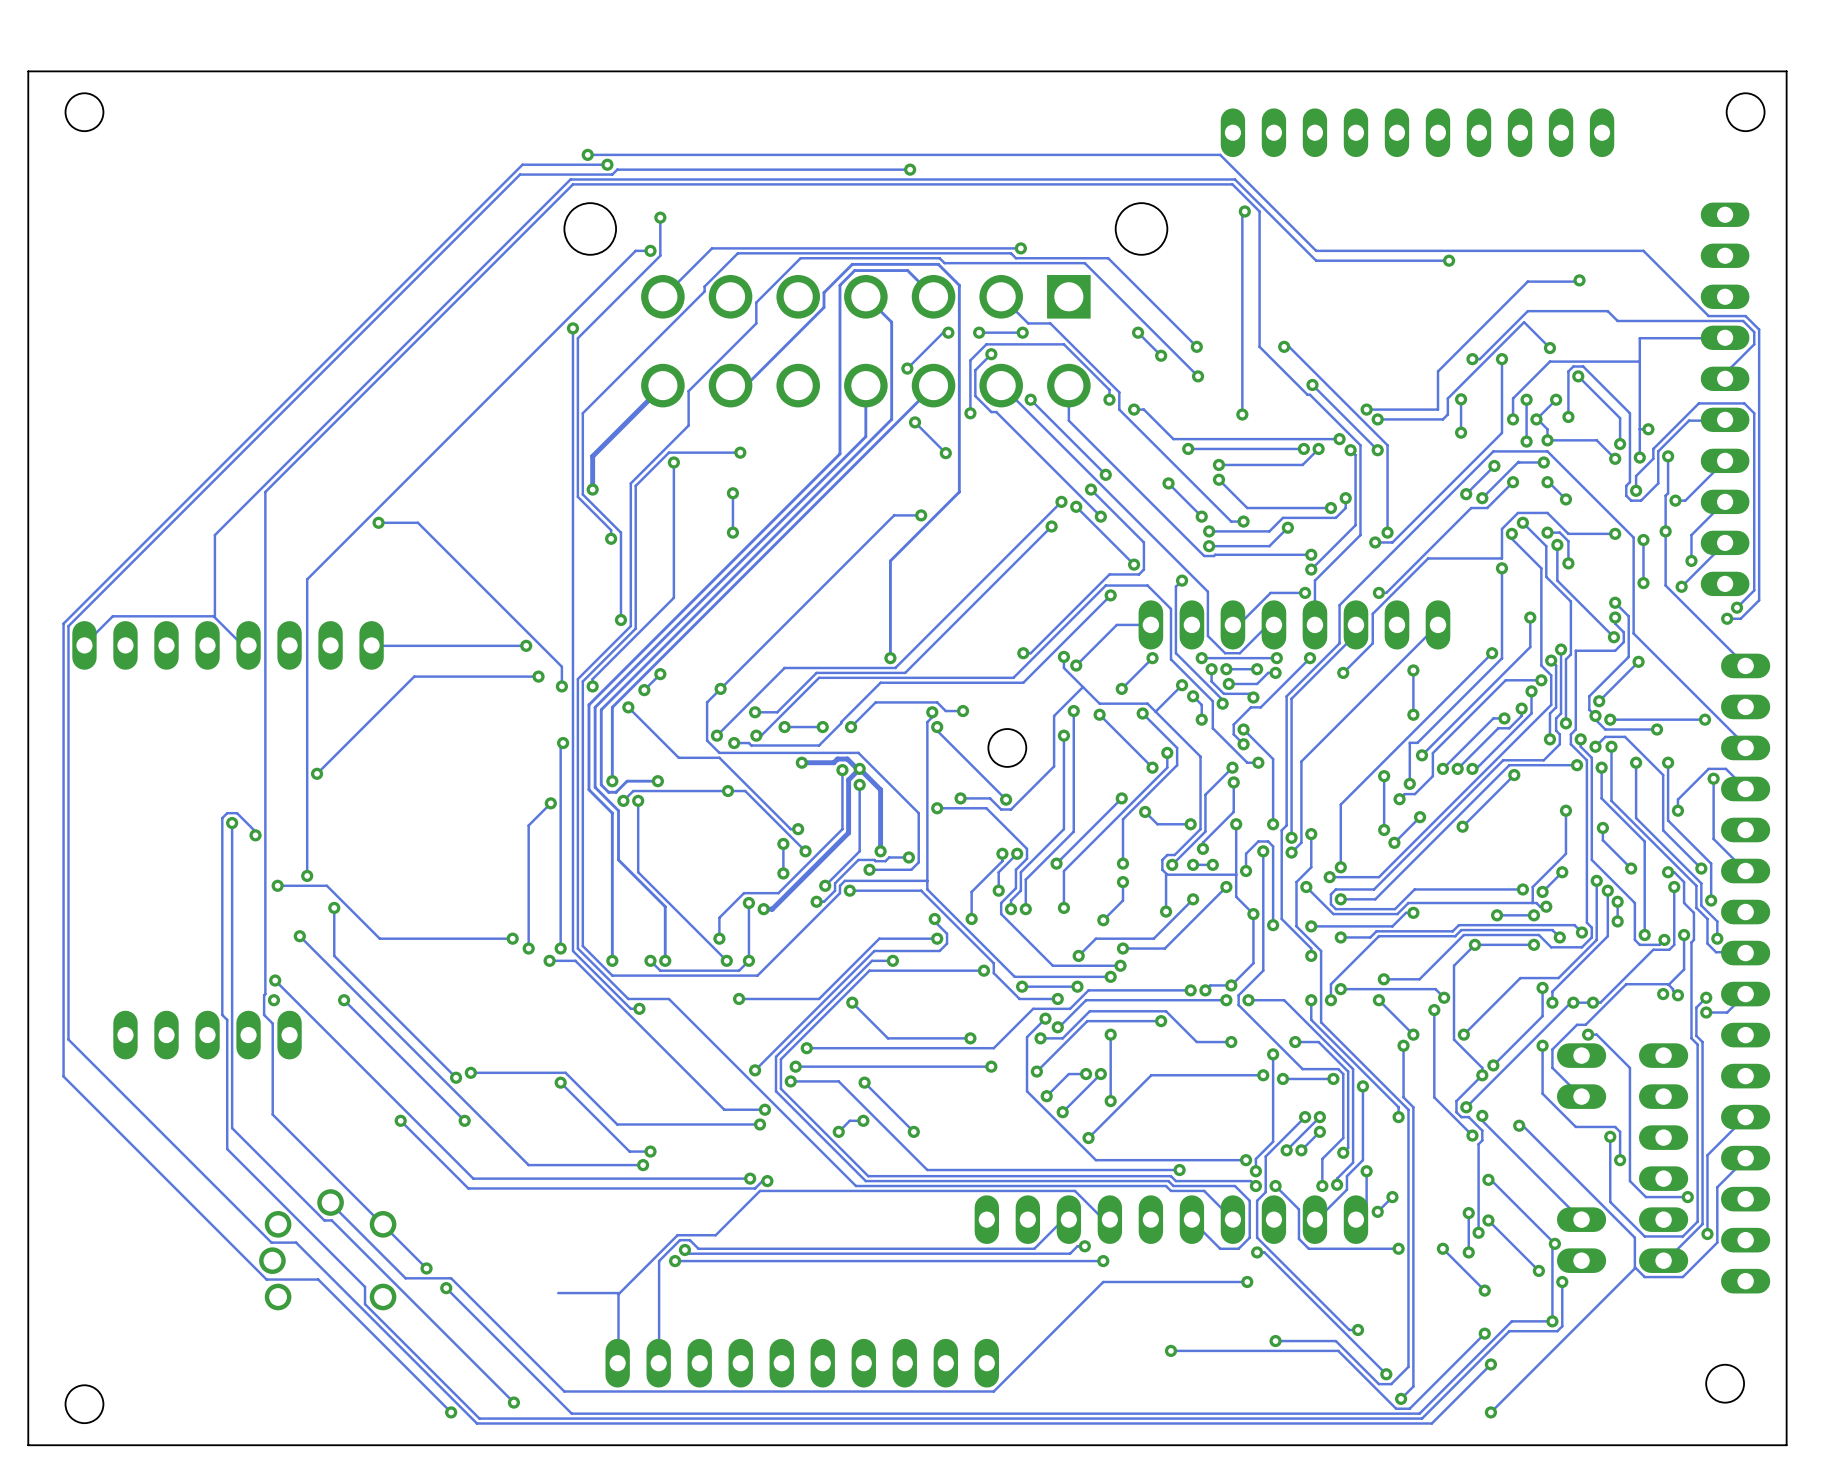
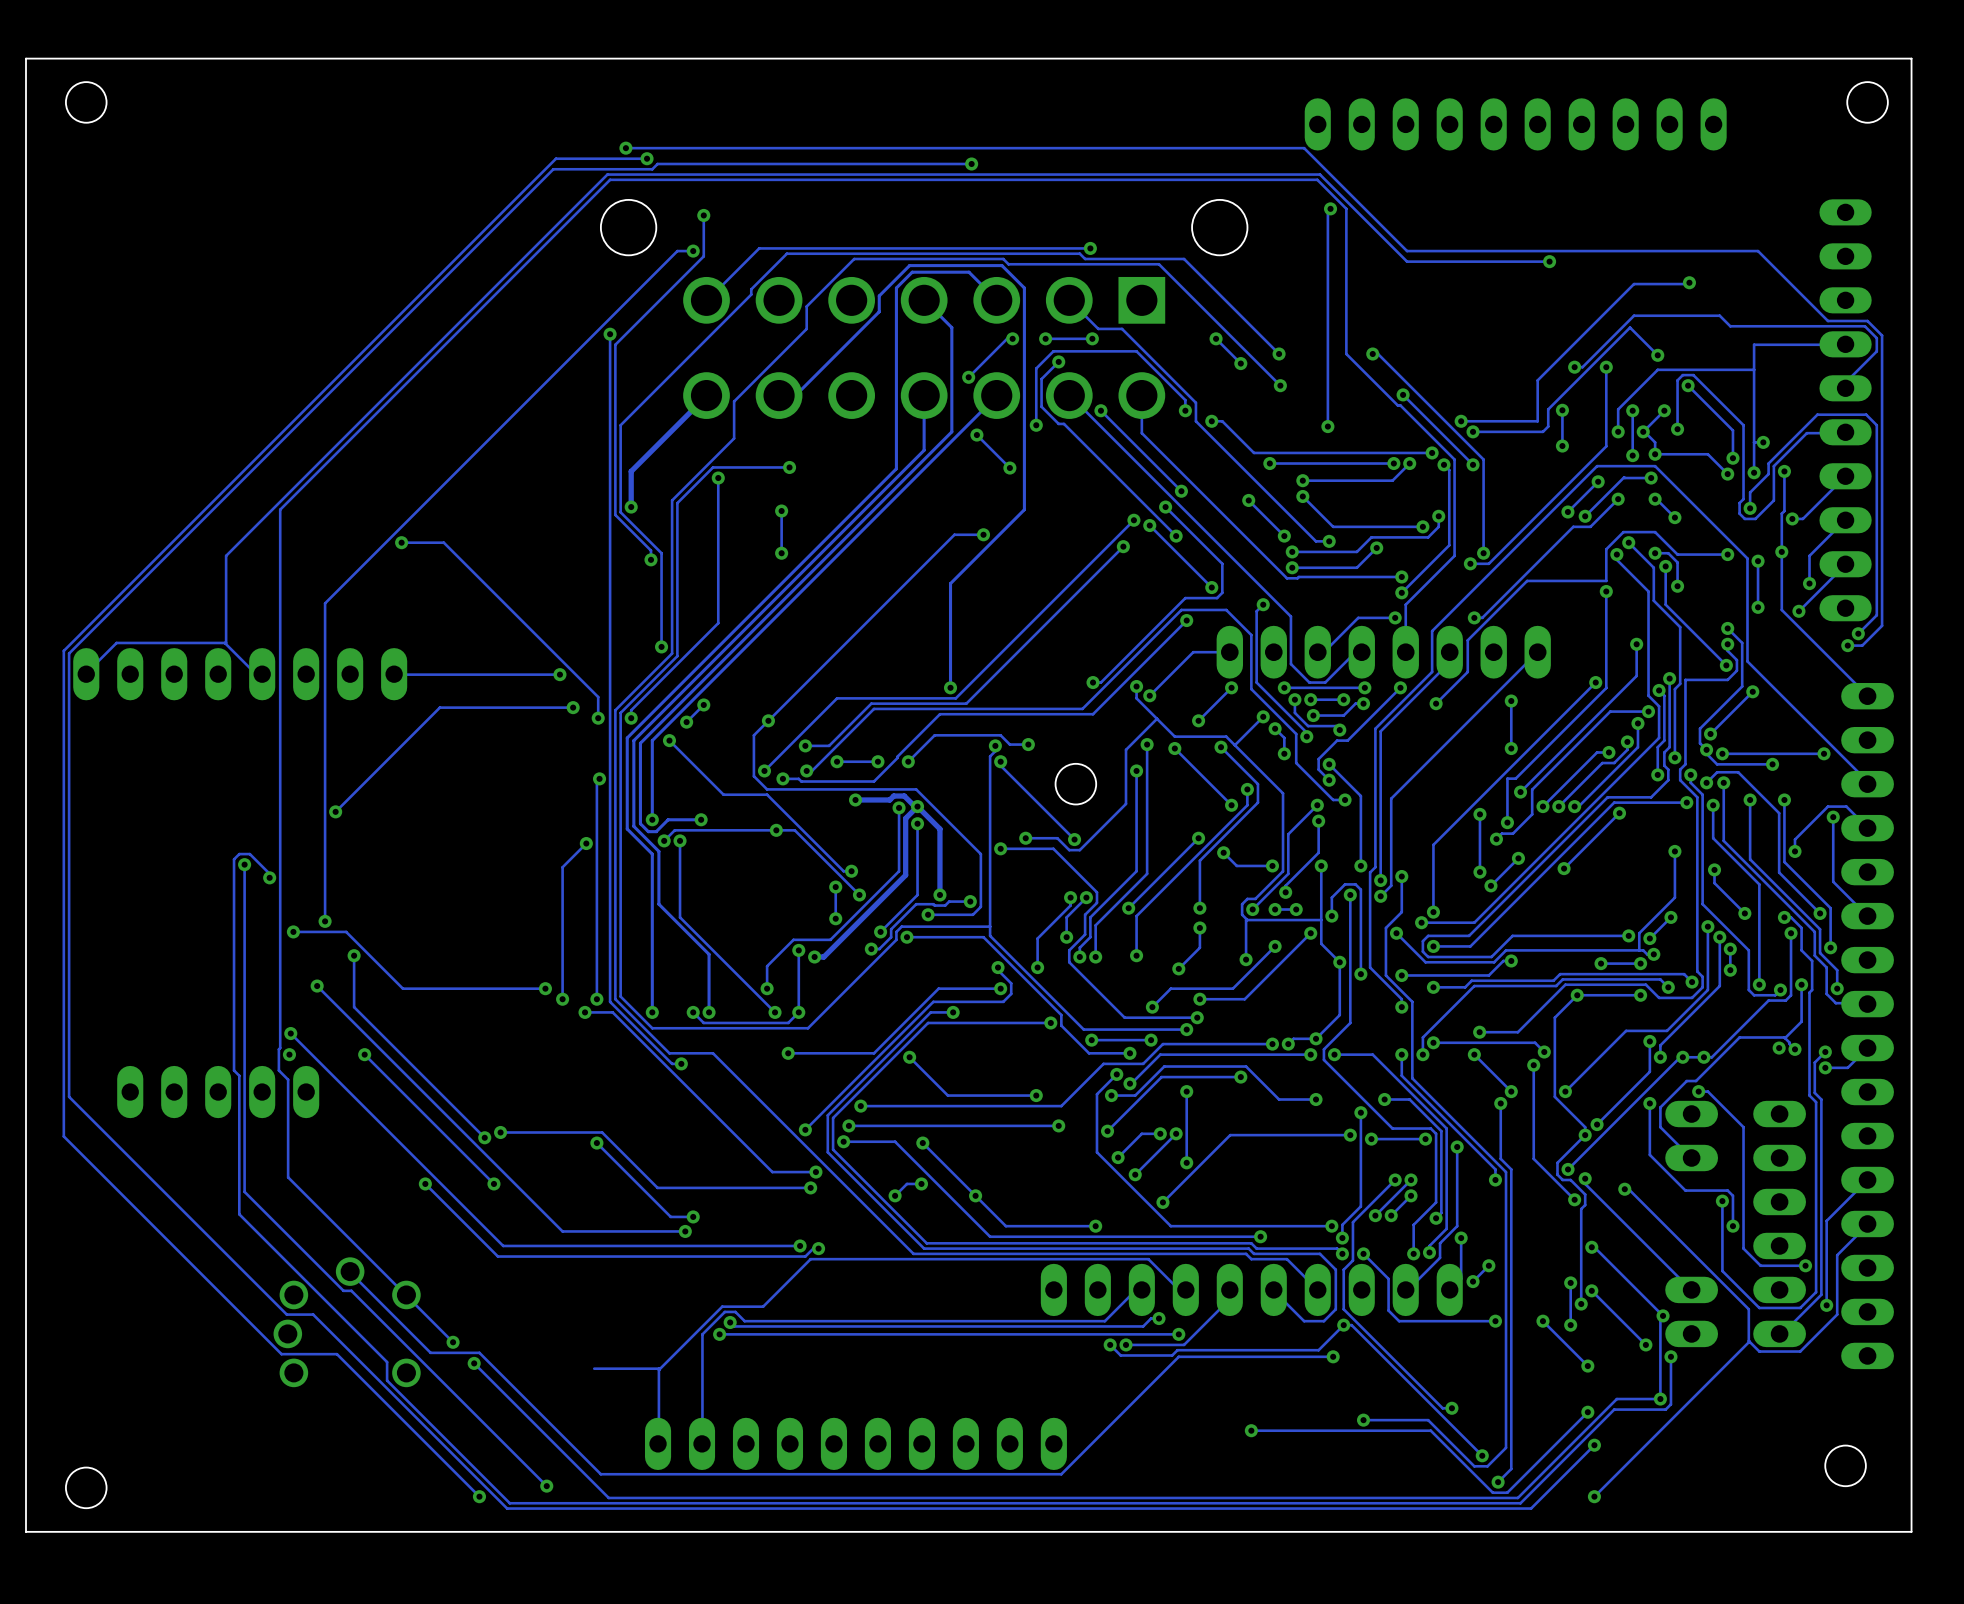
track: none -> (975, 1195) (1005, 1226) (1095, 1226)
via: none -> (1095, 1226)
track: none -> (1229, 1289) (1228, 1300) (1184, 1344) (1126, 1344)
track: none -> (1343, 1325) (1318, 1350) (1177, 1350) (1172, 1355) (1120, 1355) (1110, 1344)
via: none -> (1110, 1344)
via: none -> (1126, 1344)

